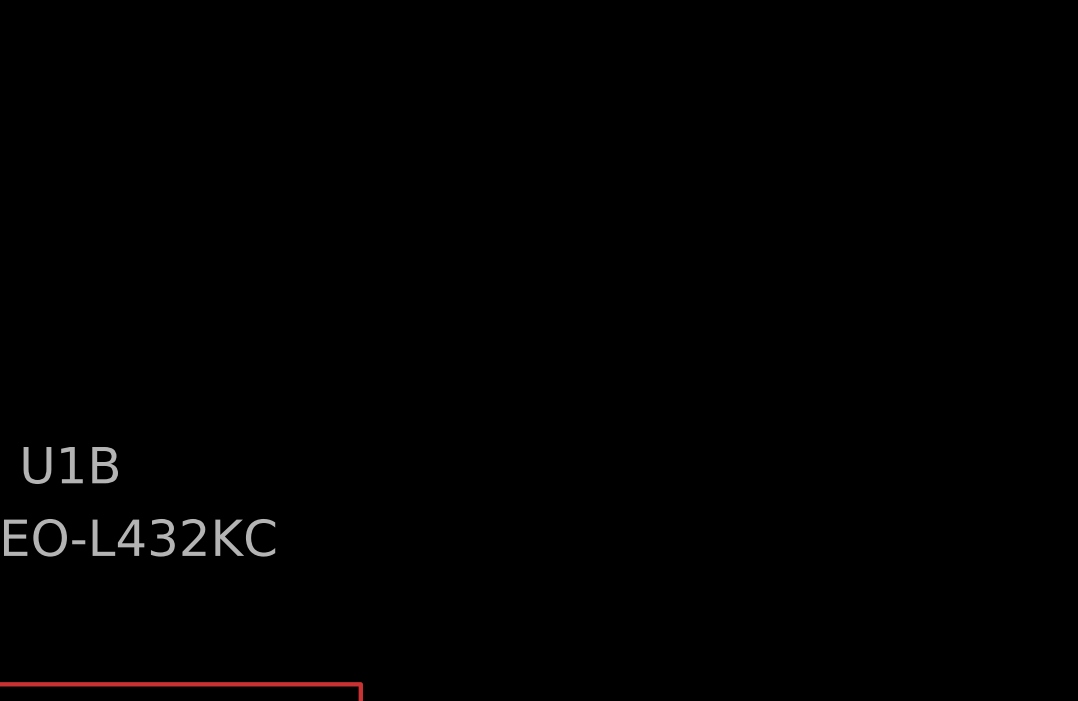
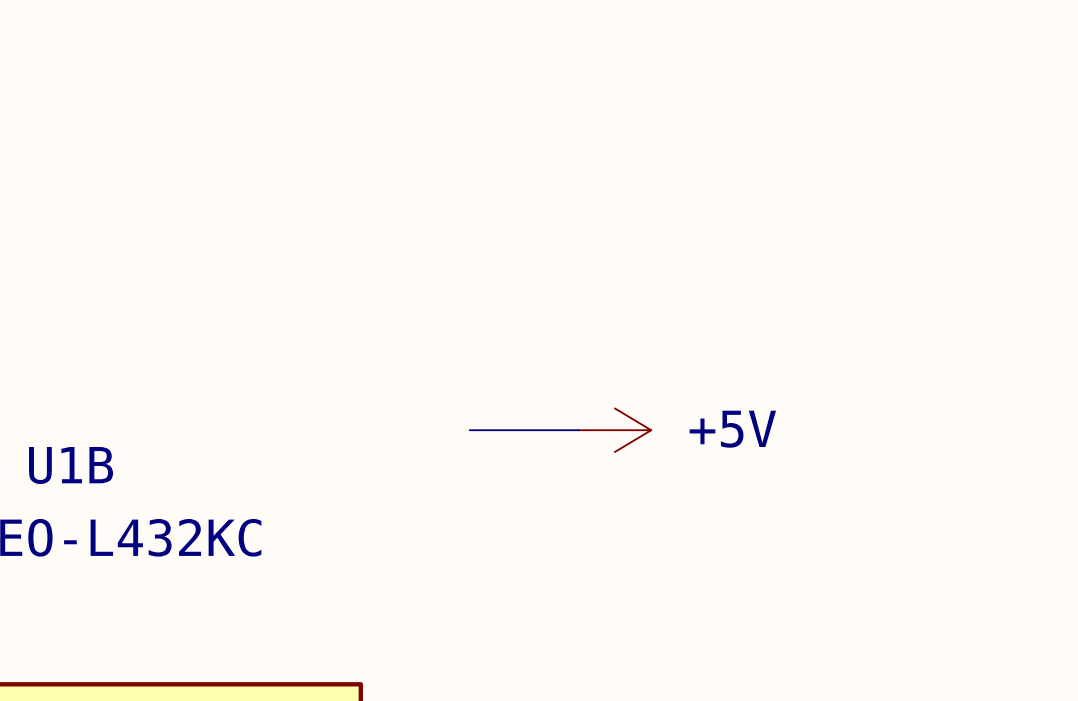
wire: none -> (469, 430) (578, 430)
power symbol: none -> +5V (614, 430)

